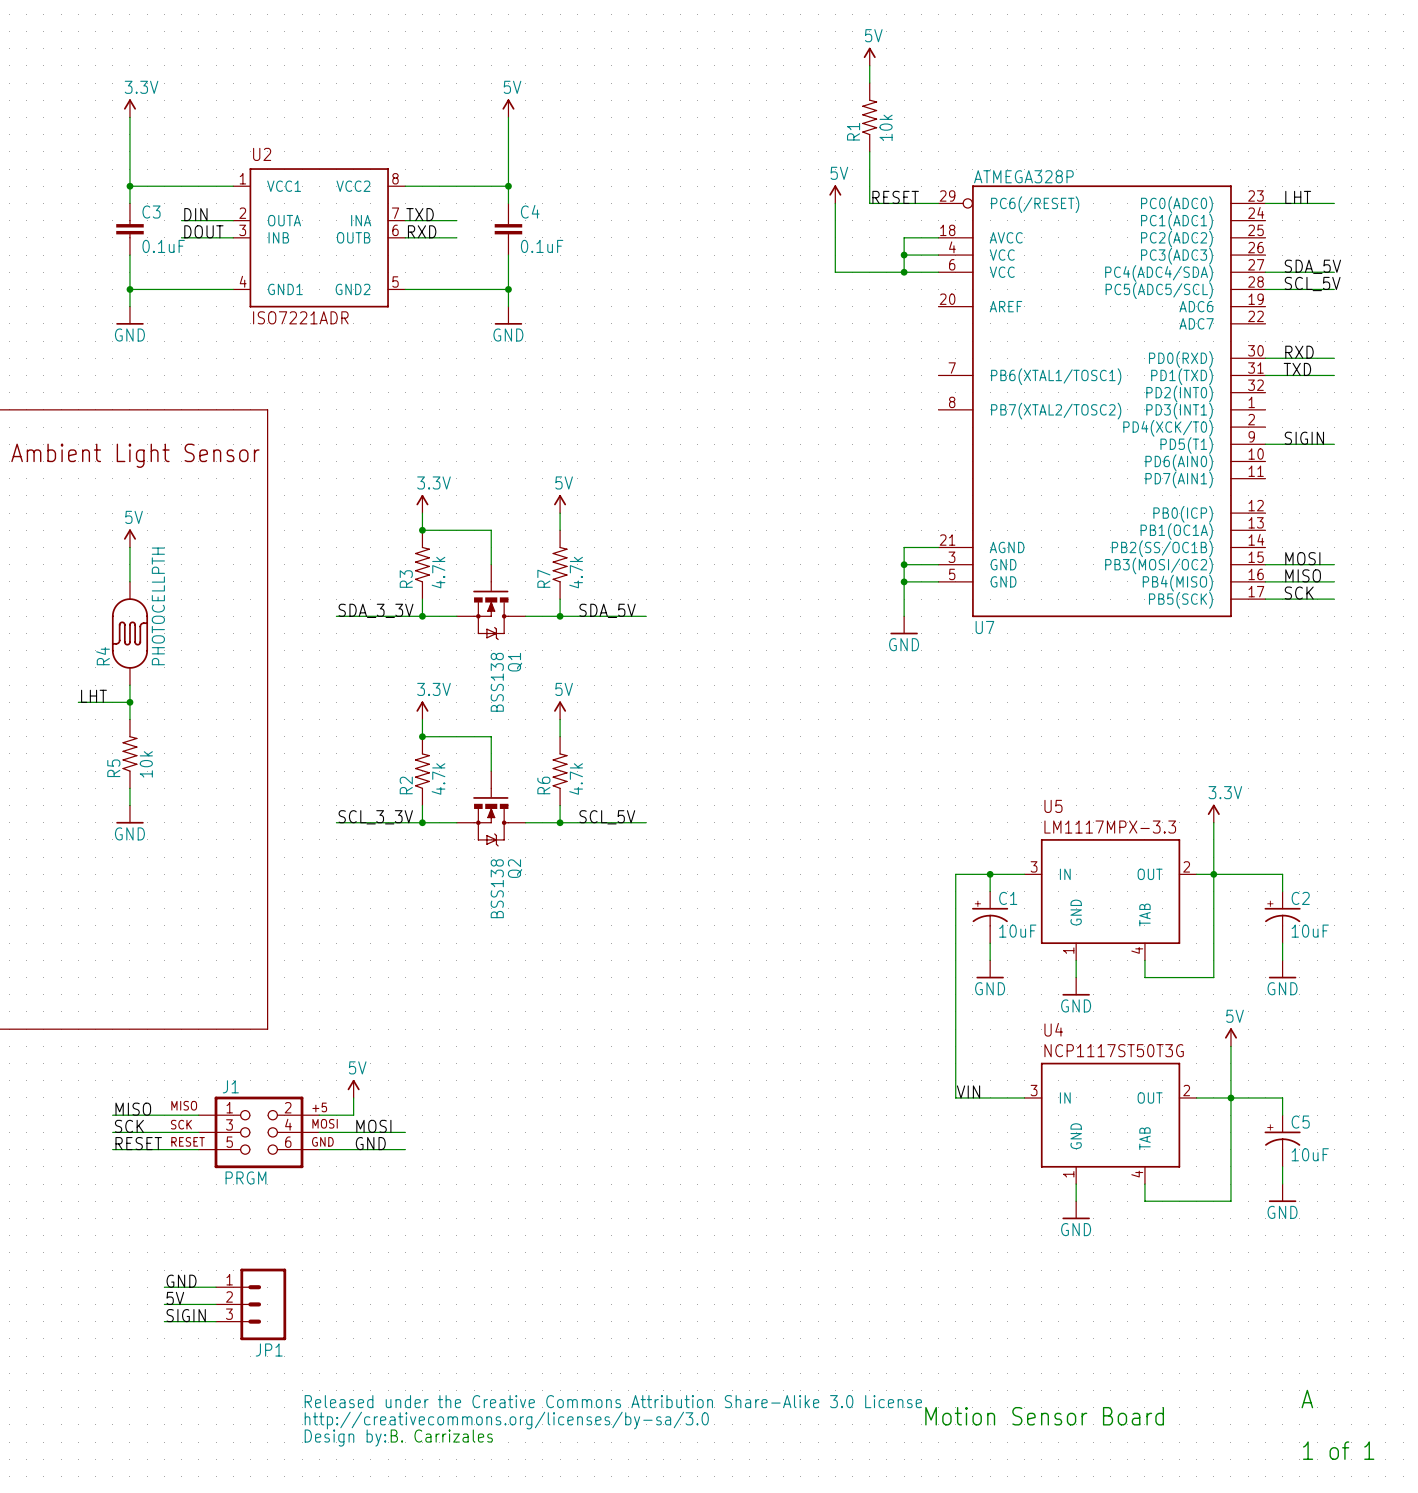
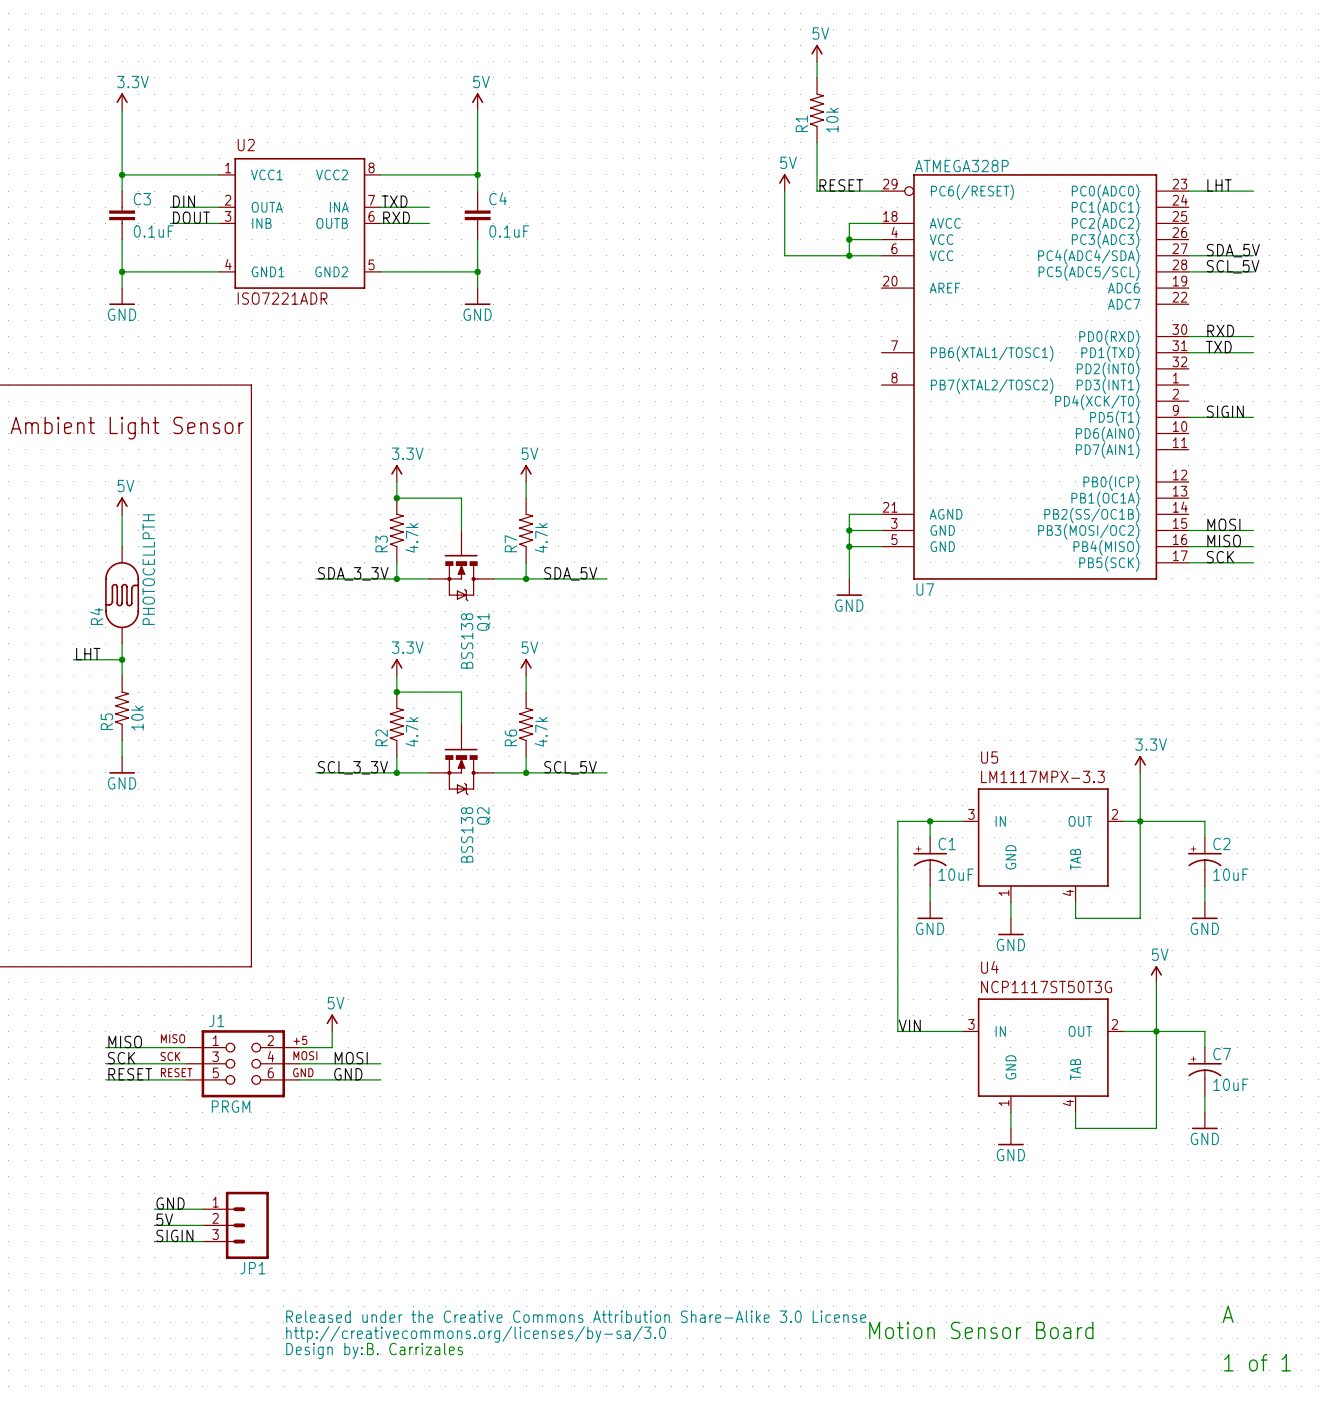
C5 name: C5 (1300, 1122) -> C7 (1222, 1054)

